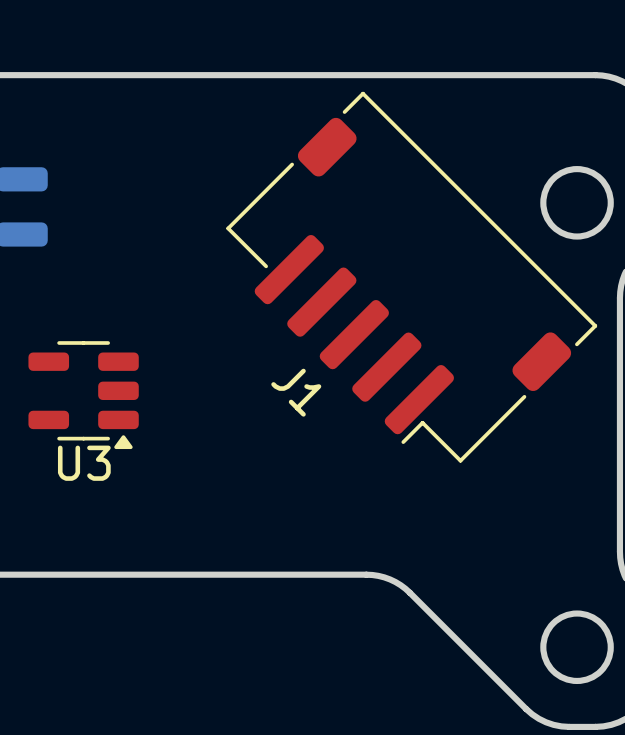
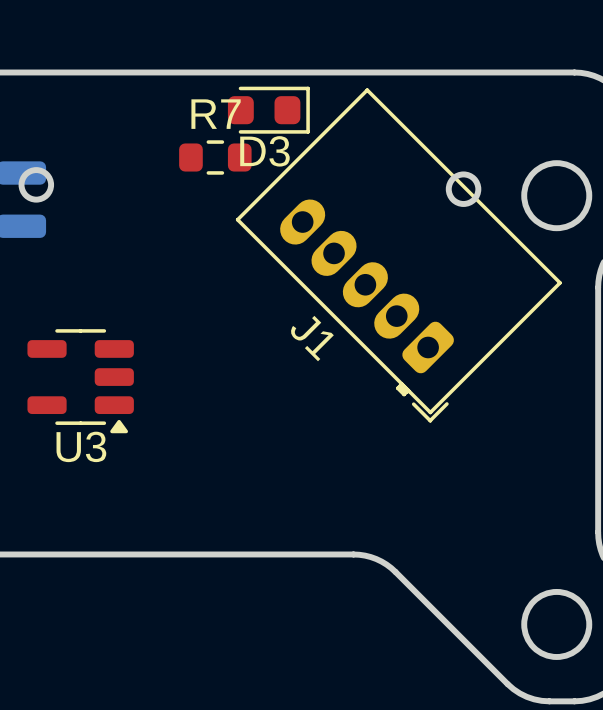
J1 footprint: [226, 91, 598, 463] -> [235, 88, 562, 423]
D3: none -> (268, 110)
R7: none -> (215, 157)
round board edge: none -> [18, 167, 55, 203]
round board edge: none -> [445, 171, 482, 207]

